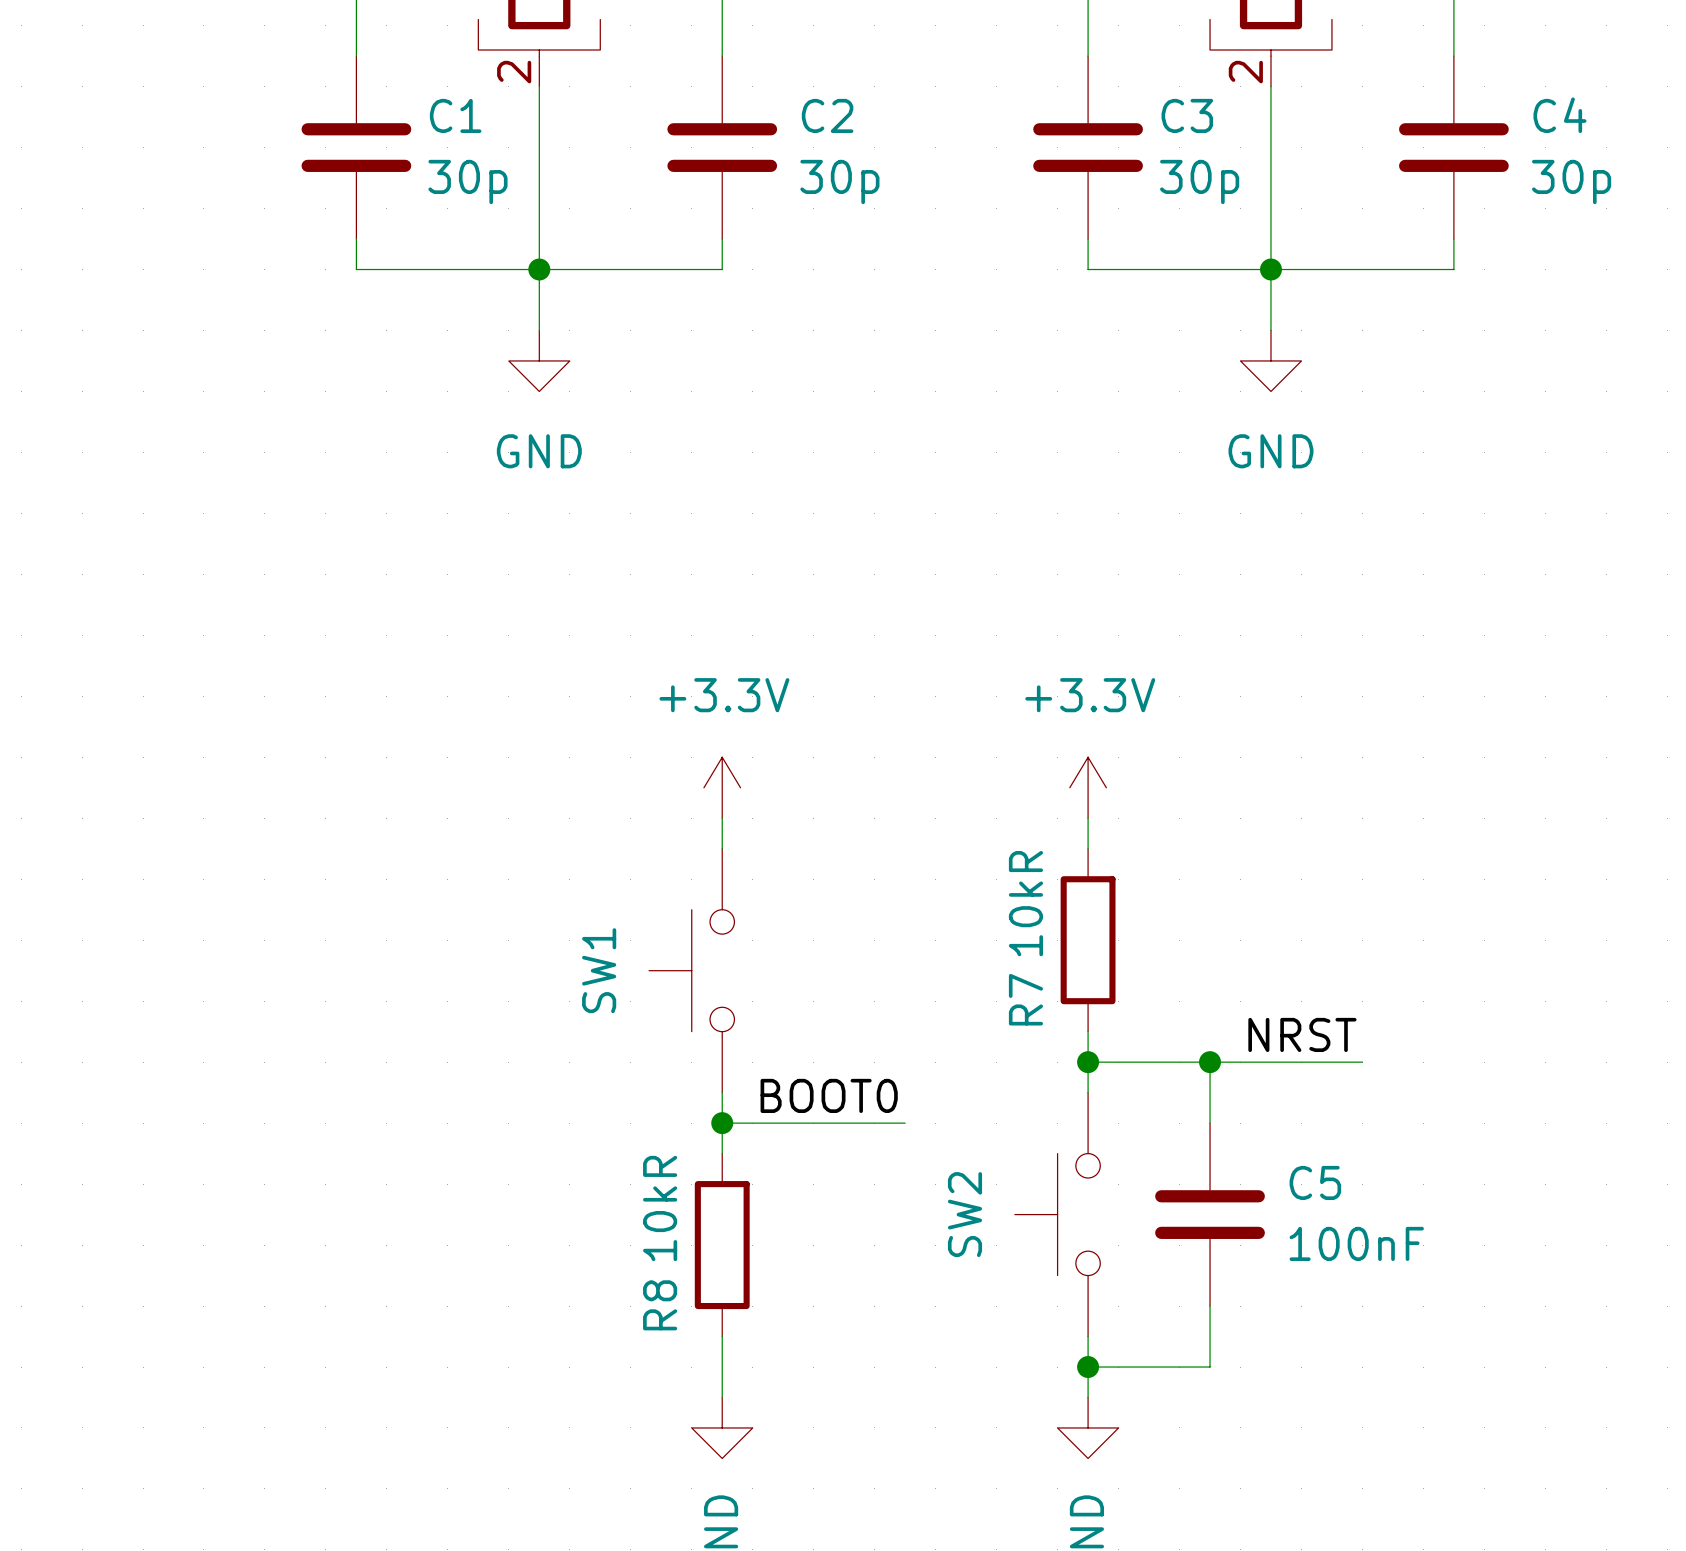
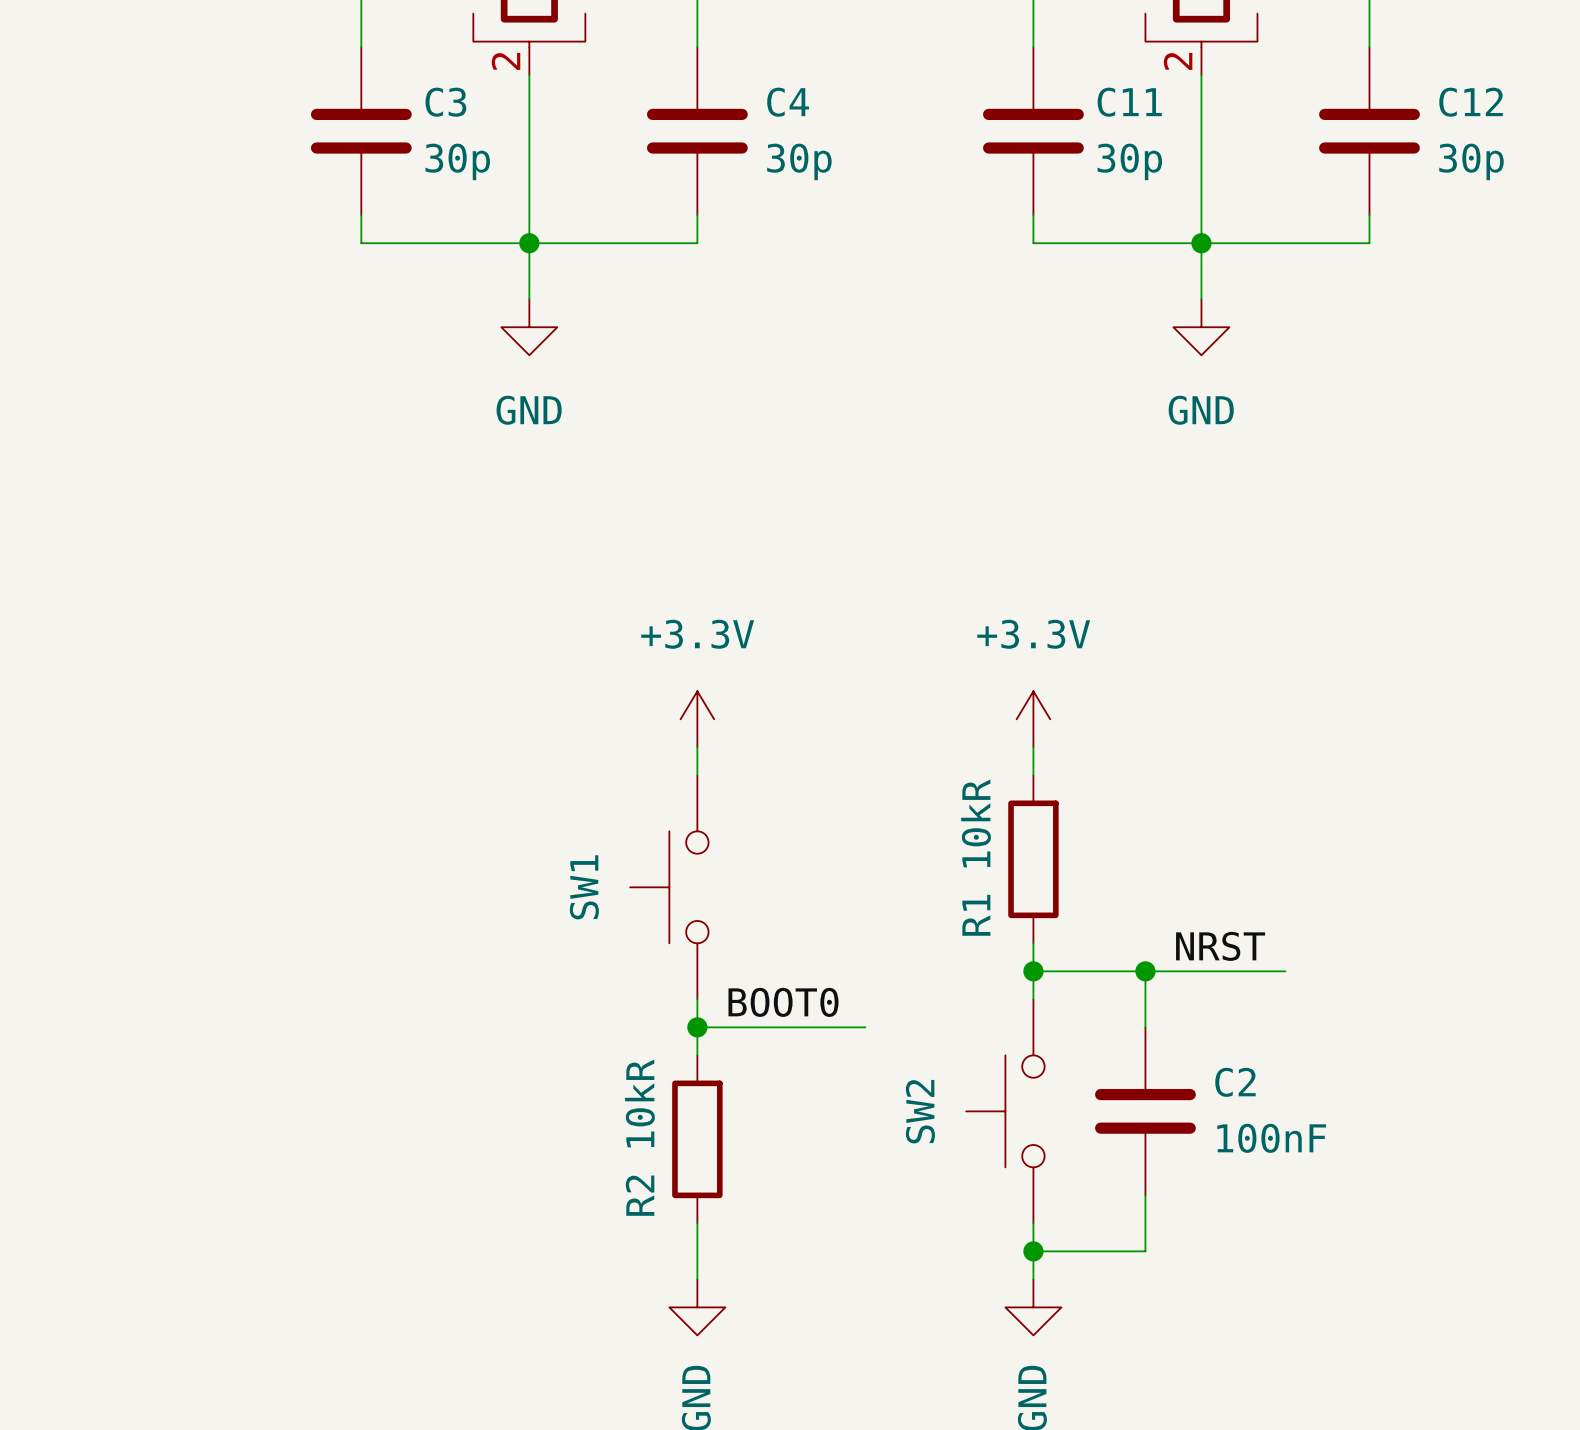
C1 name: C1 (455, 115) -> C3 (445, 102)
C2 name: C2 (827, 115) -> C4 (788, 102)
C3 name: C3 (1187, 115) -> C11 (1129, 102)
C4 name: C4 (1559, 115) -> C12 (1471, 102)
R7 name: R7 (1025, 999) -> R1 (976, 915)
C5 name: C5 (1315, 1182) -> C2 (1235, 1082)
R8 name: R8 (660, 1305) -> R2 (640, 1195)

